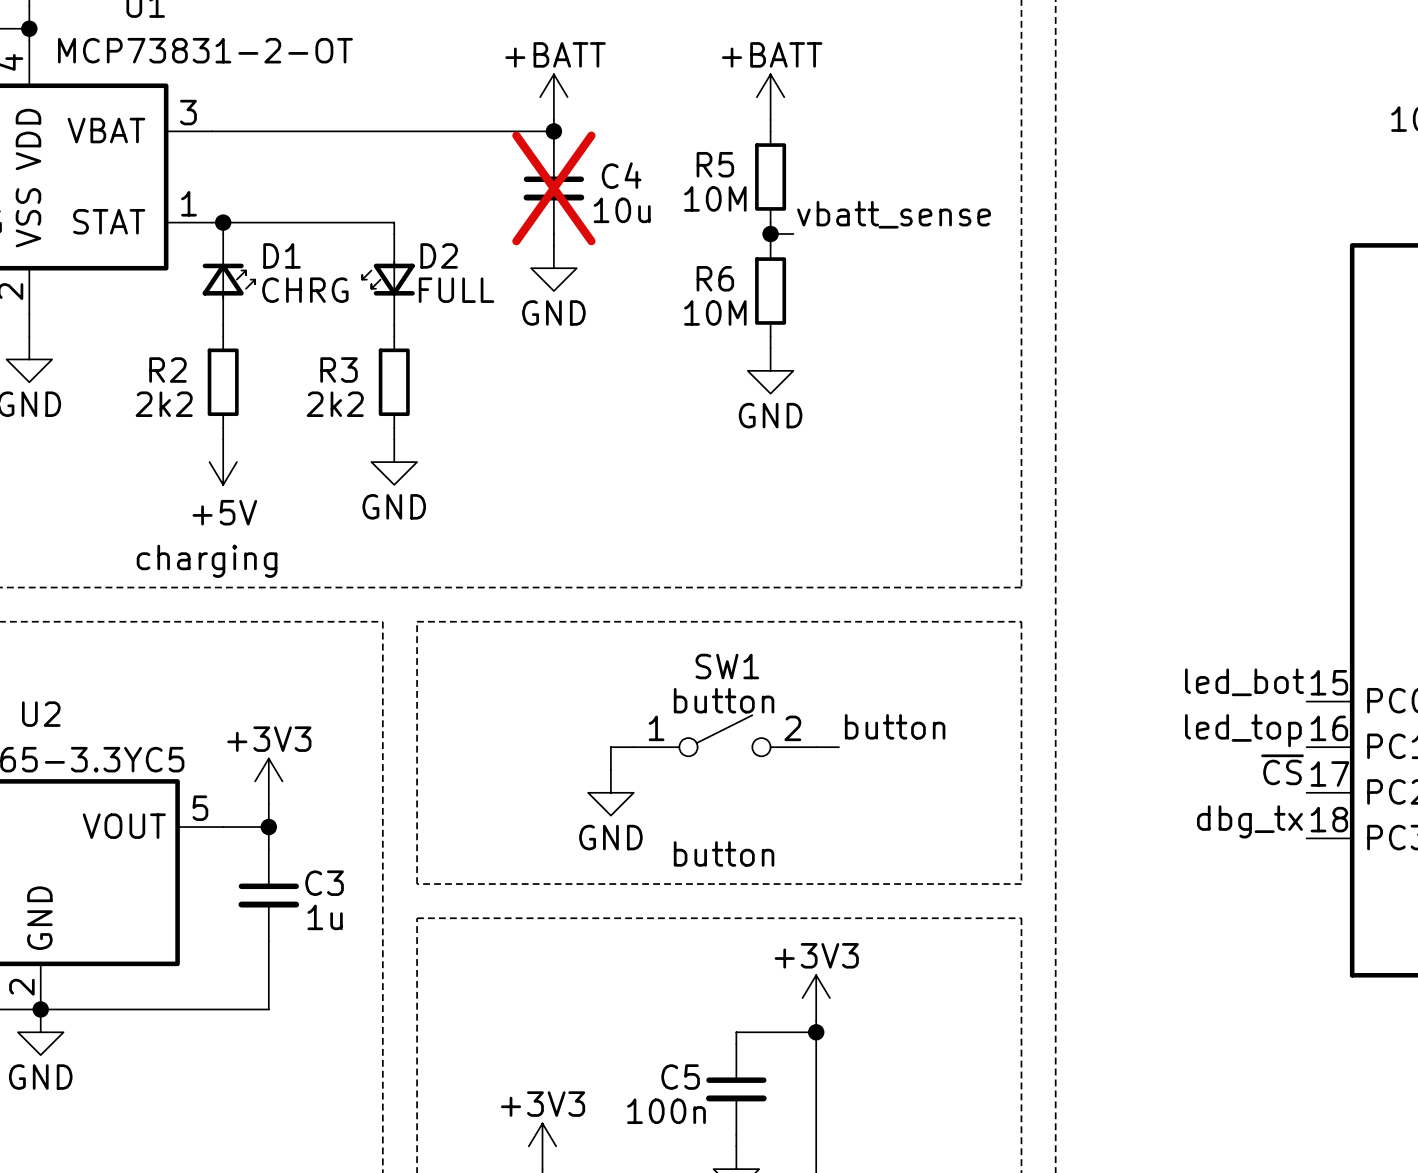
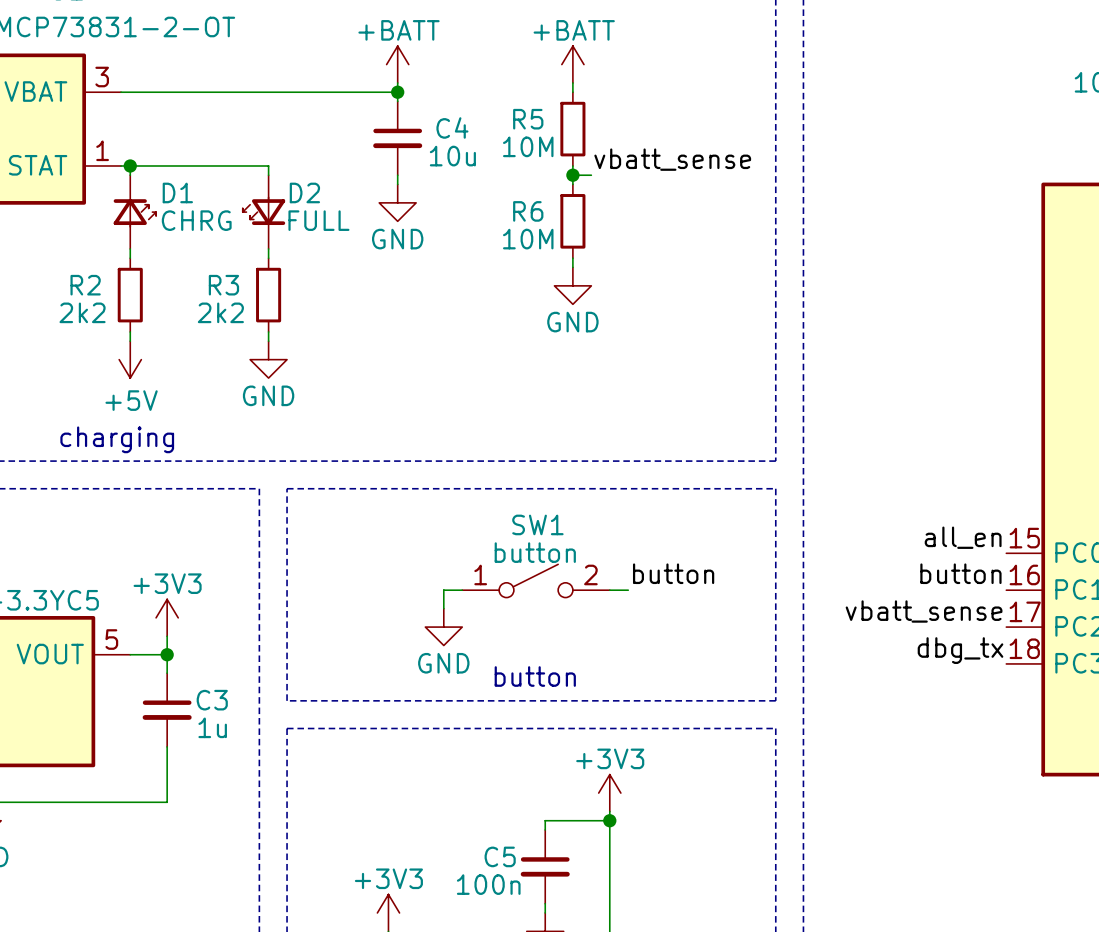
C4 do-not-place cross: (553, 188) -> none
label: led_bot (1244, 682) -> all_en (963, 537)
label: led_top (1243, 730) -> button (960, 573)
label: ~{CS} (1282, 769) -> vbatt_sense (924, 611)

